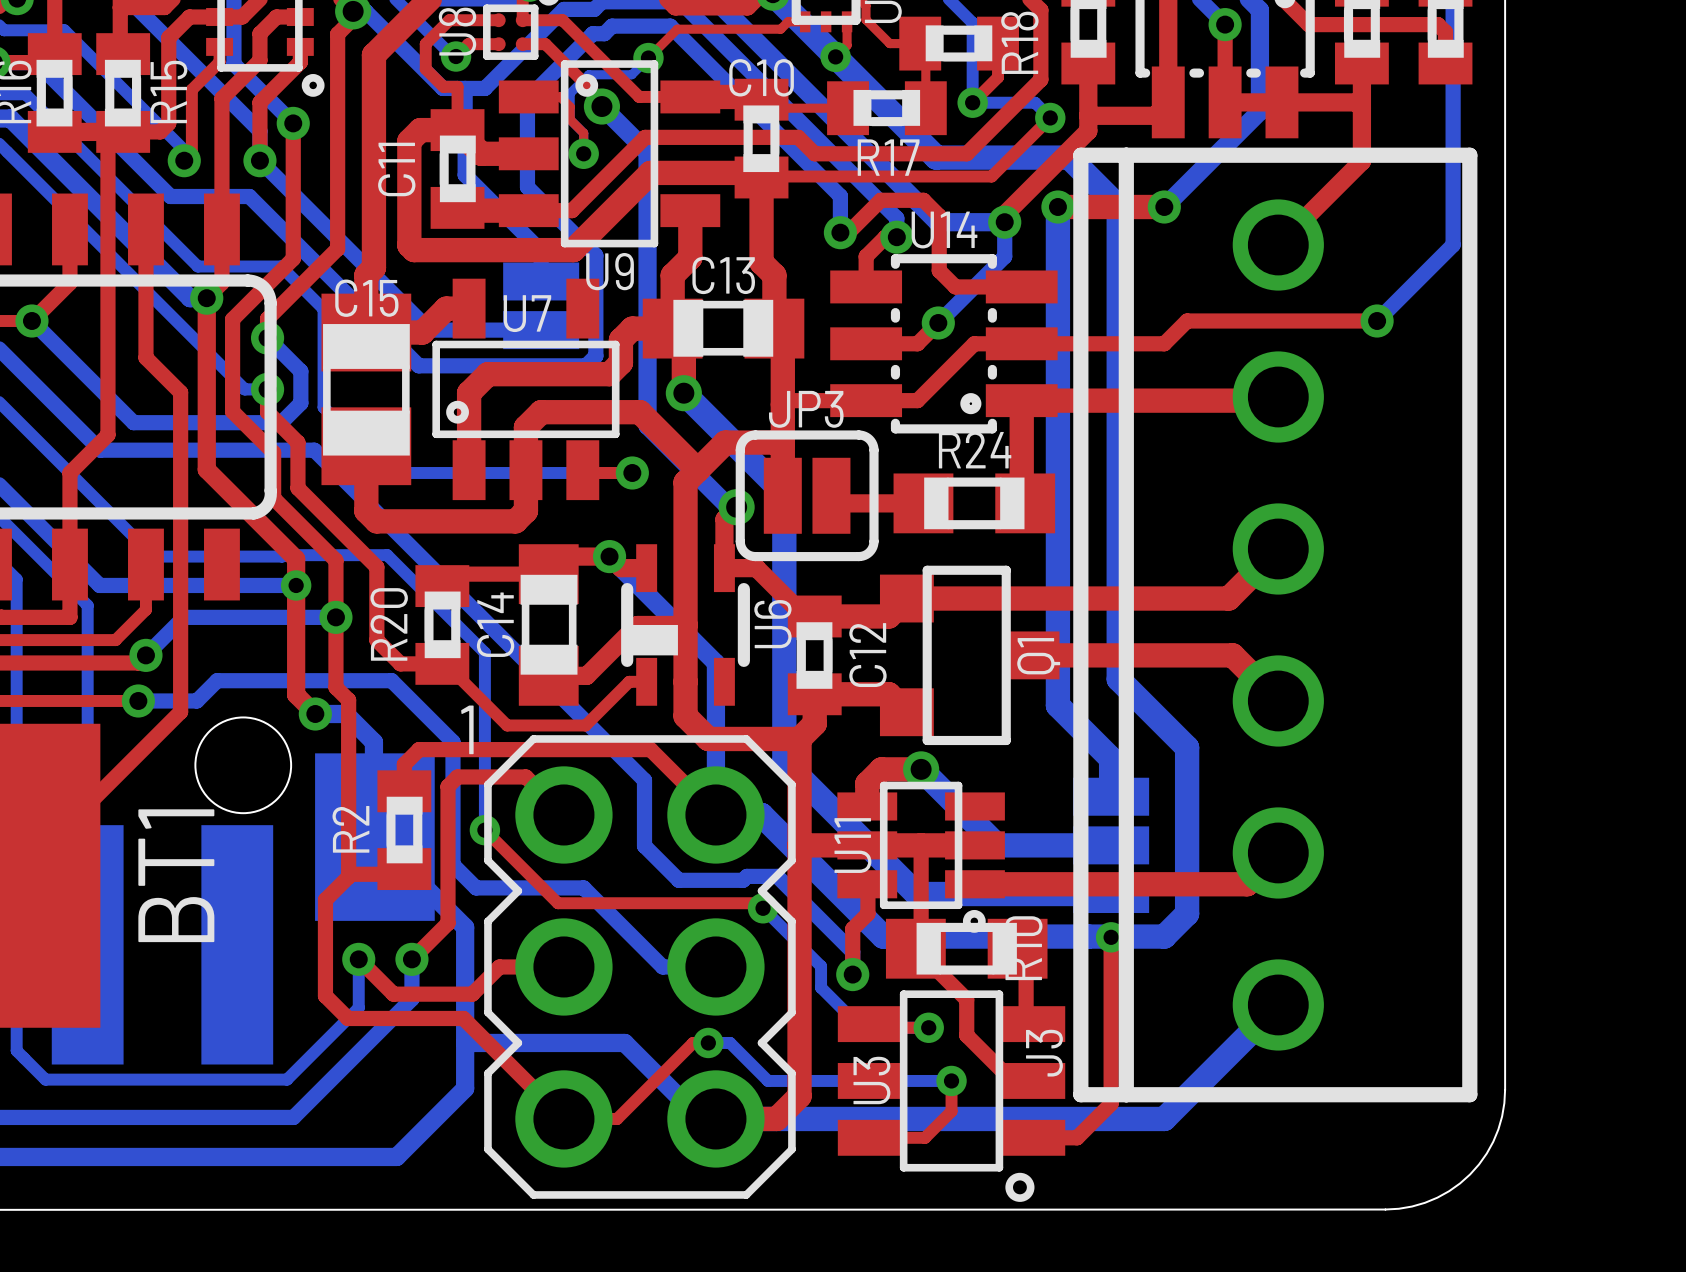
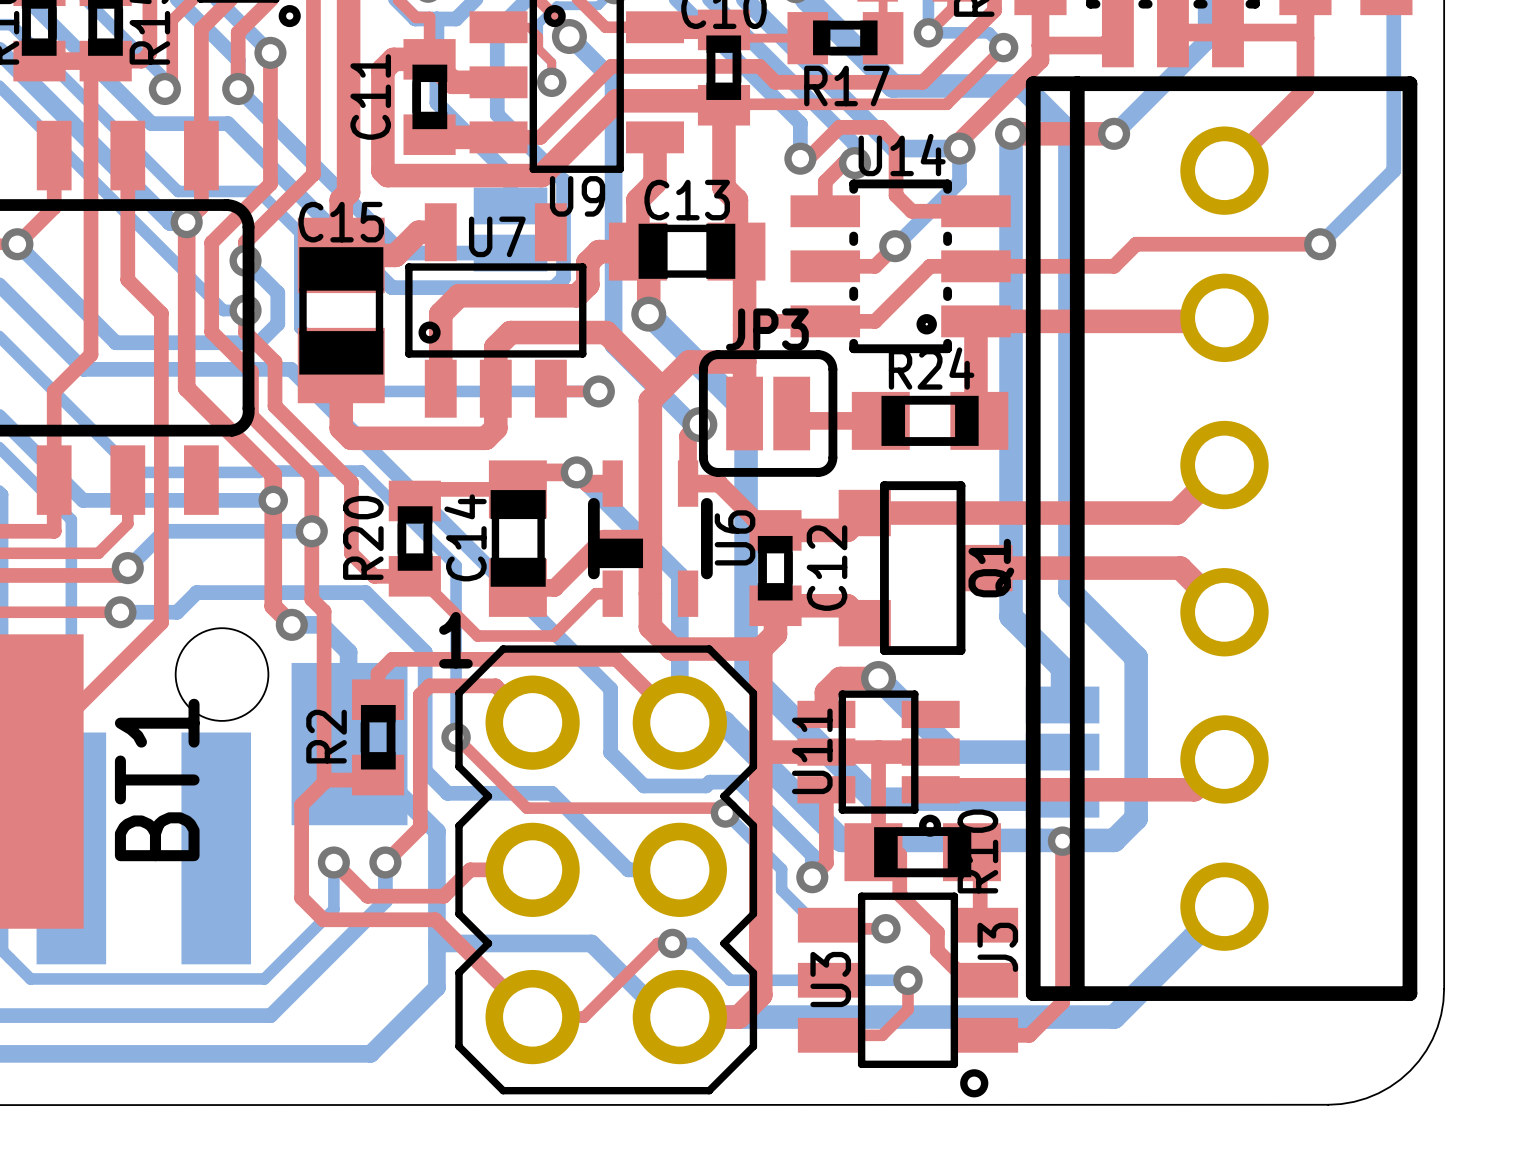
top track: (867, 884) (867, 913) (852, 928) (852, 974) -> (826, 789) (826, 863) (812, 877)
top track: (921, 929) (915, 948) (966, 999) (966, 1035) (981, 1050) -> (878, 833) (899, 855) (899, 894) (937, 932) (937, 950)

